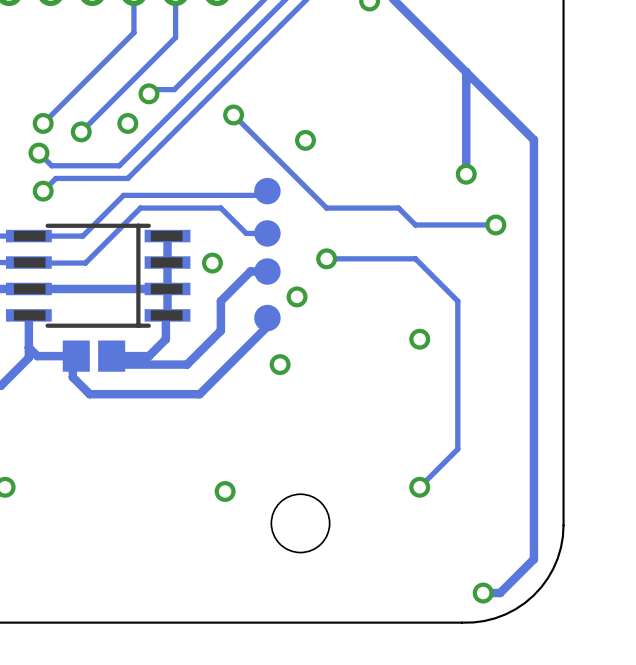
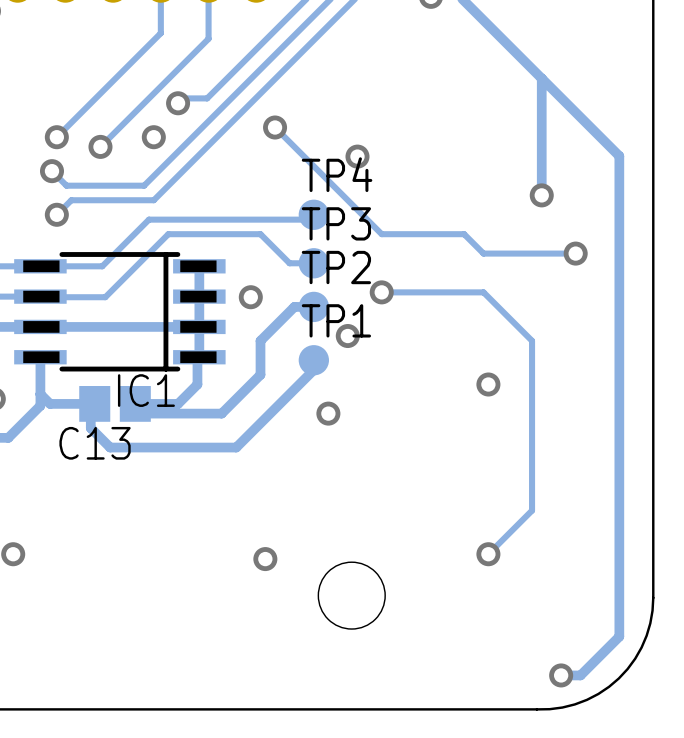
TP4 name: none -> TP4 (337, 174)
TP3 name: none -> TP3 (336, 223)
TP2 name: none -> TP2 (336, 267)
TP1 name: none -> TP1 (336, 320)
IC1 name: none -> IC1 (146, 390)
C13 name: none -> C13 (95, 443)

